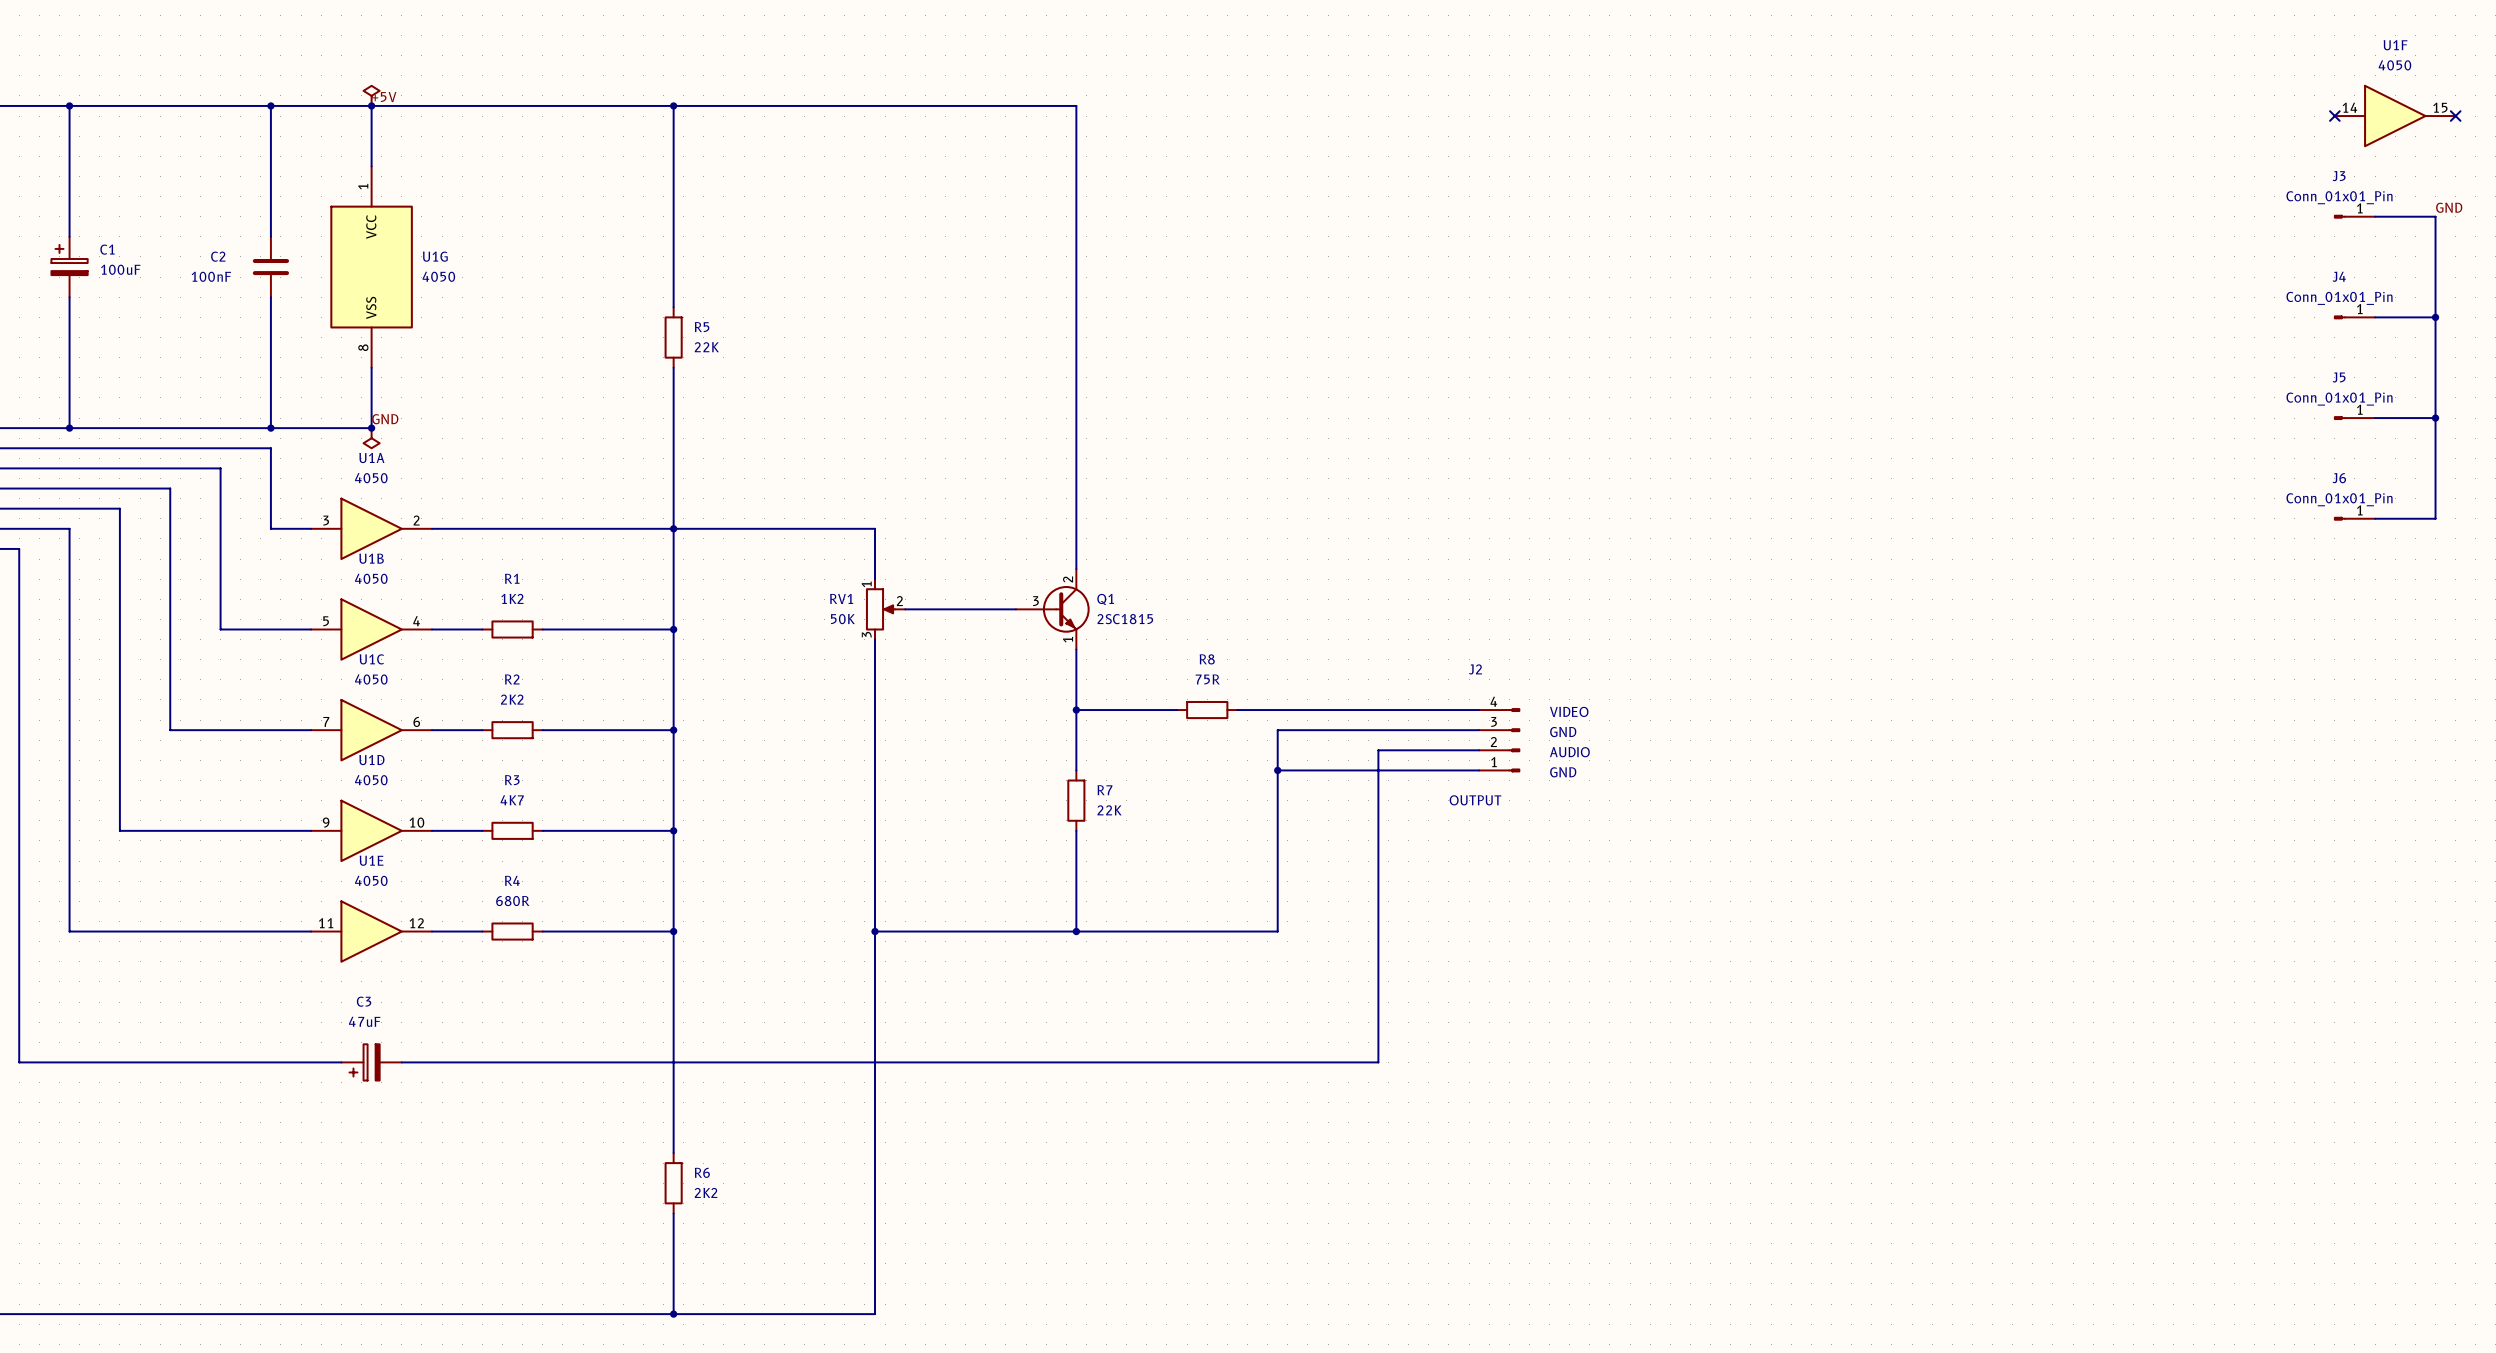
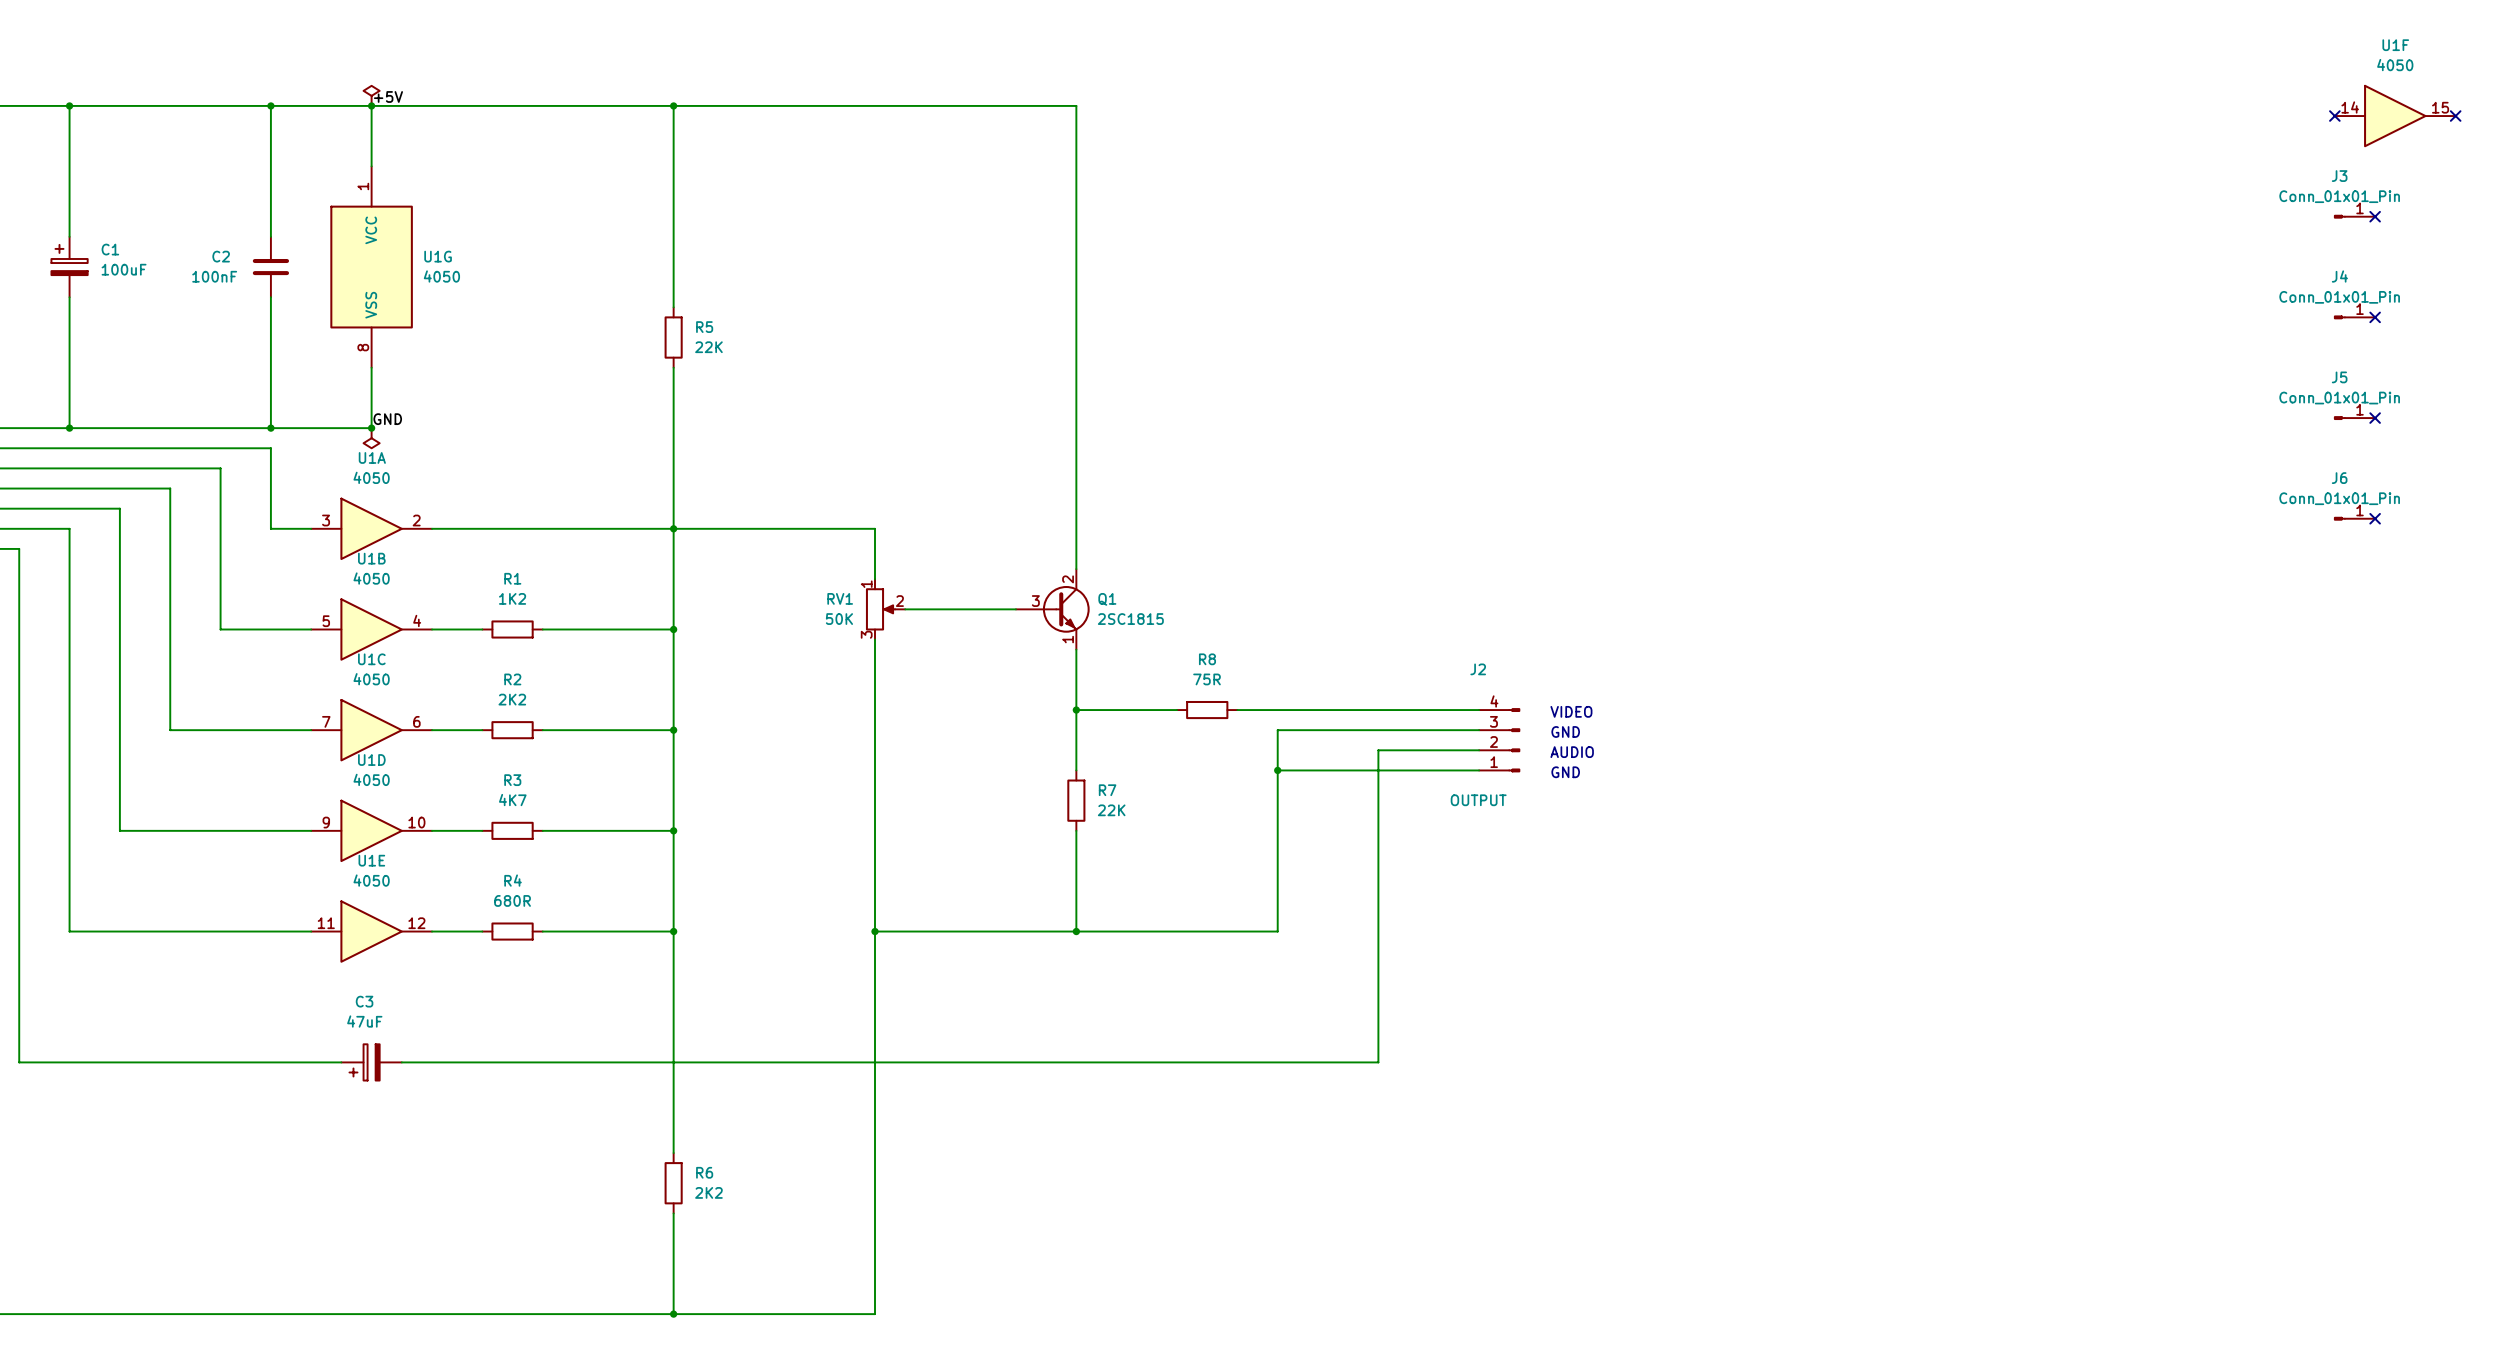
label: GND (2449, 207) -> none
wire: (2375, 216) (2435, 216) (2435, 518) (2375, 518) -> none
no-connect mark: none -> (2375, 216)
wire: (2375, 317) (2435, 317) -> none
no-connect mark: none -> (2375, 317)
junction: (2435, 317) -> none
wire: (2375, 418) (2435, 418) -> none
no-connect mark: none -> (2375, 418)
junction: (2435, 418) -> none
no-connect mark: none -> (2375, 518)

